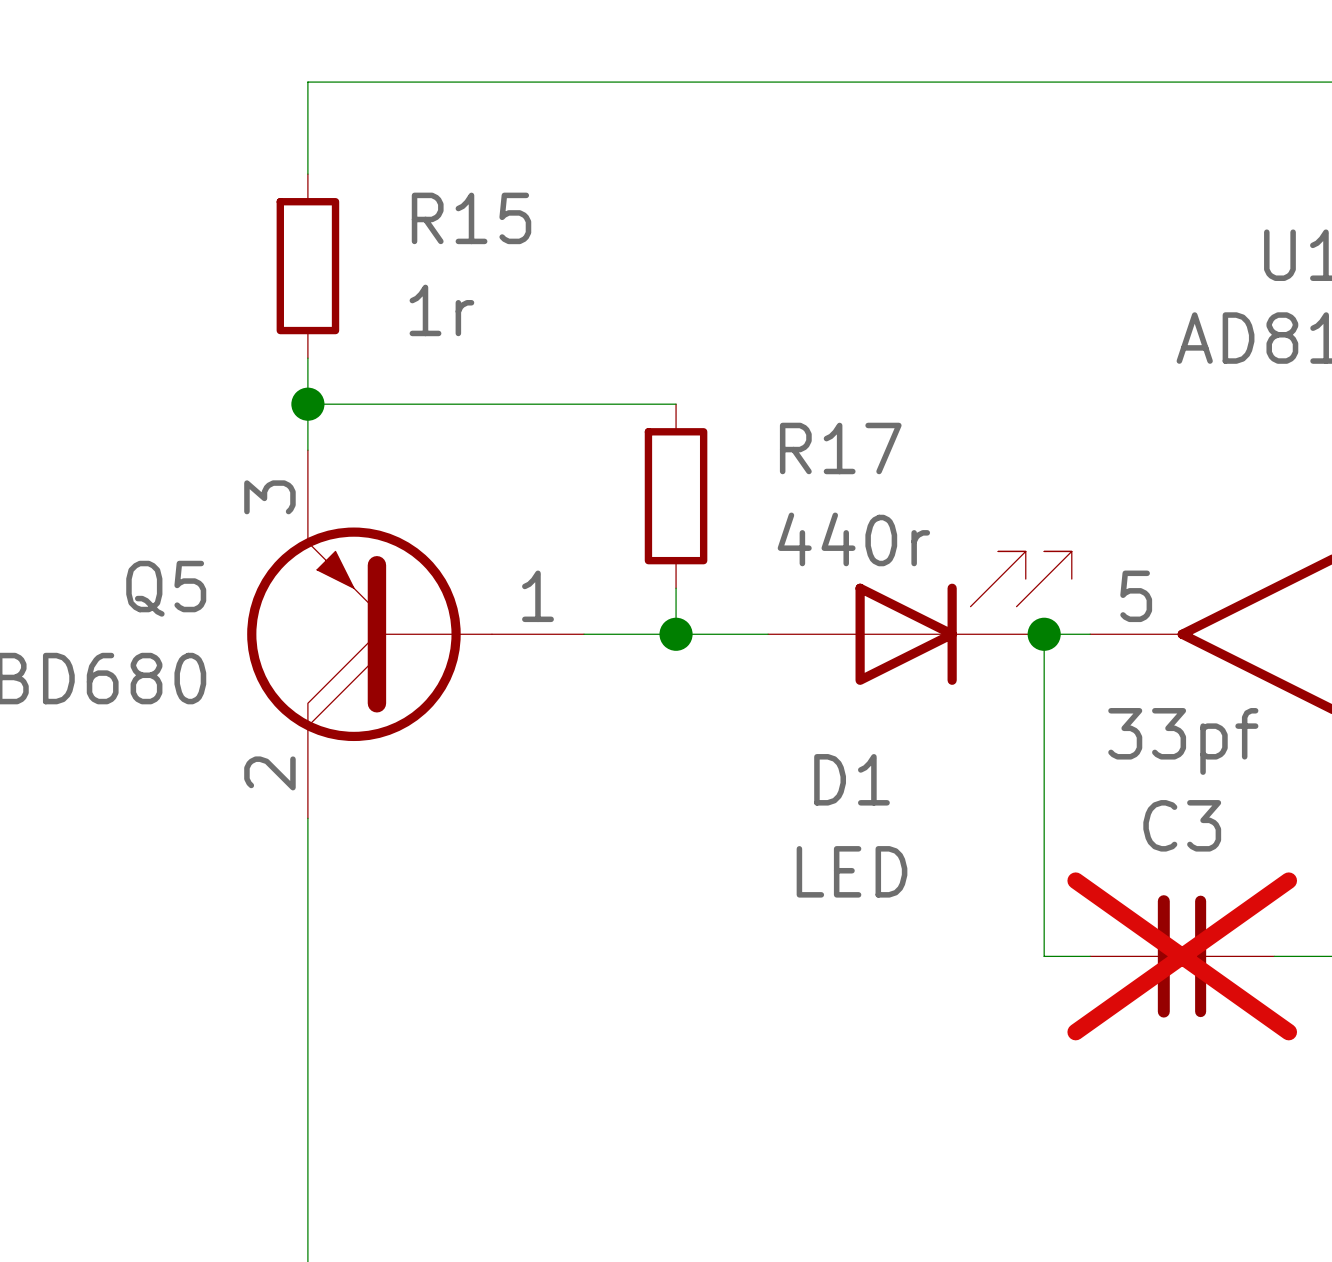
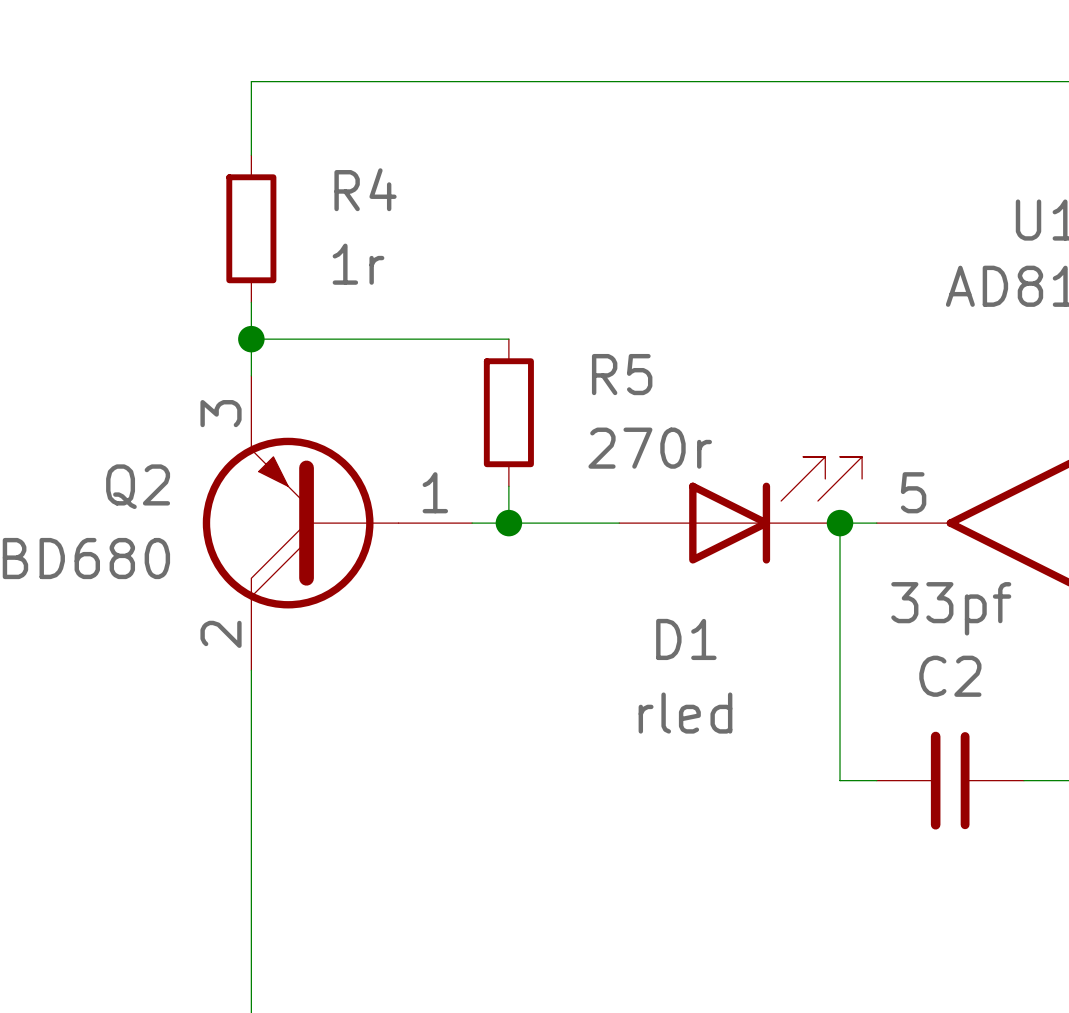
R15 name: R15 (471, 218) -> R4 (365, 189)
wire: (630, 404) (676, 404) -> none
R5: none -> 270r (508, 412)
R17: 440r (676, 496) -> none
Q5 name: Q5 (166, 588) -> Q2 (138, 486)
wire: (676, 588) (676, 634) -> (508, 486) (508, 523)
junction position: (676, 634) -> (508, 523)
C3 name: C3 (1182, 825) -> C2 (950, 676)
D1 value: LED (852, 871) -> rled (685, 713)
C3 do-not-place cross: (1182, 956) -> none

